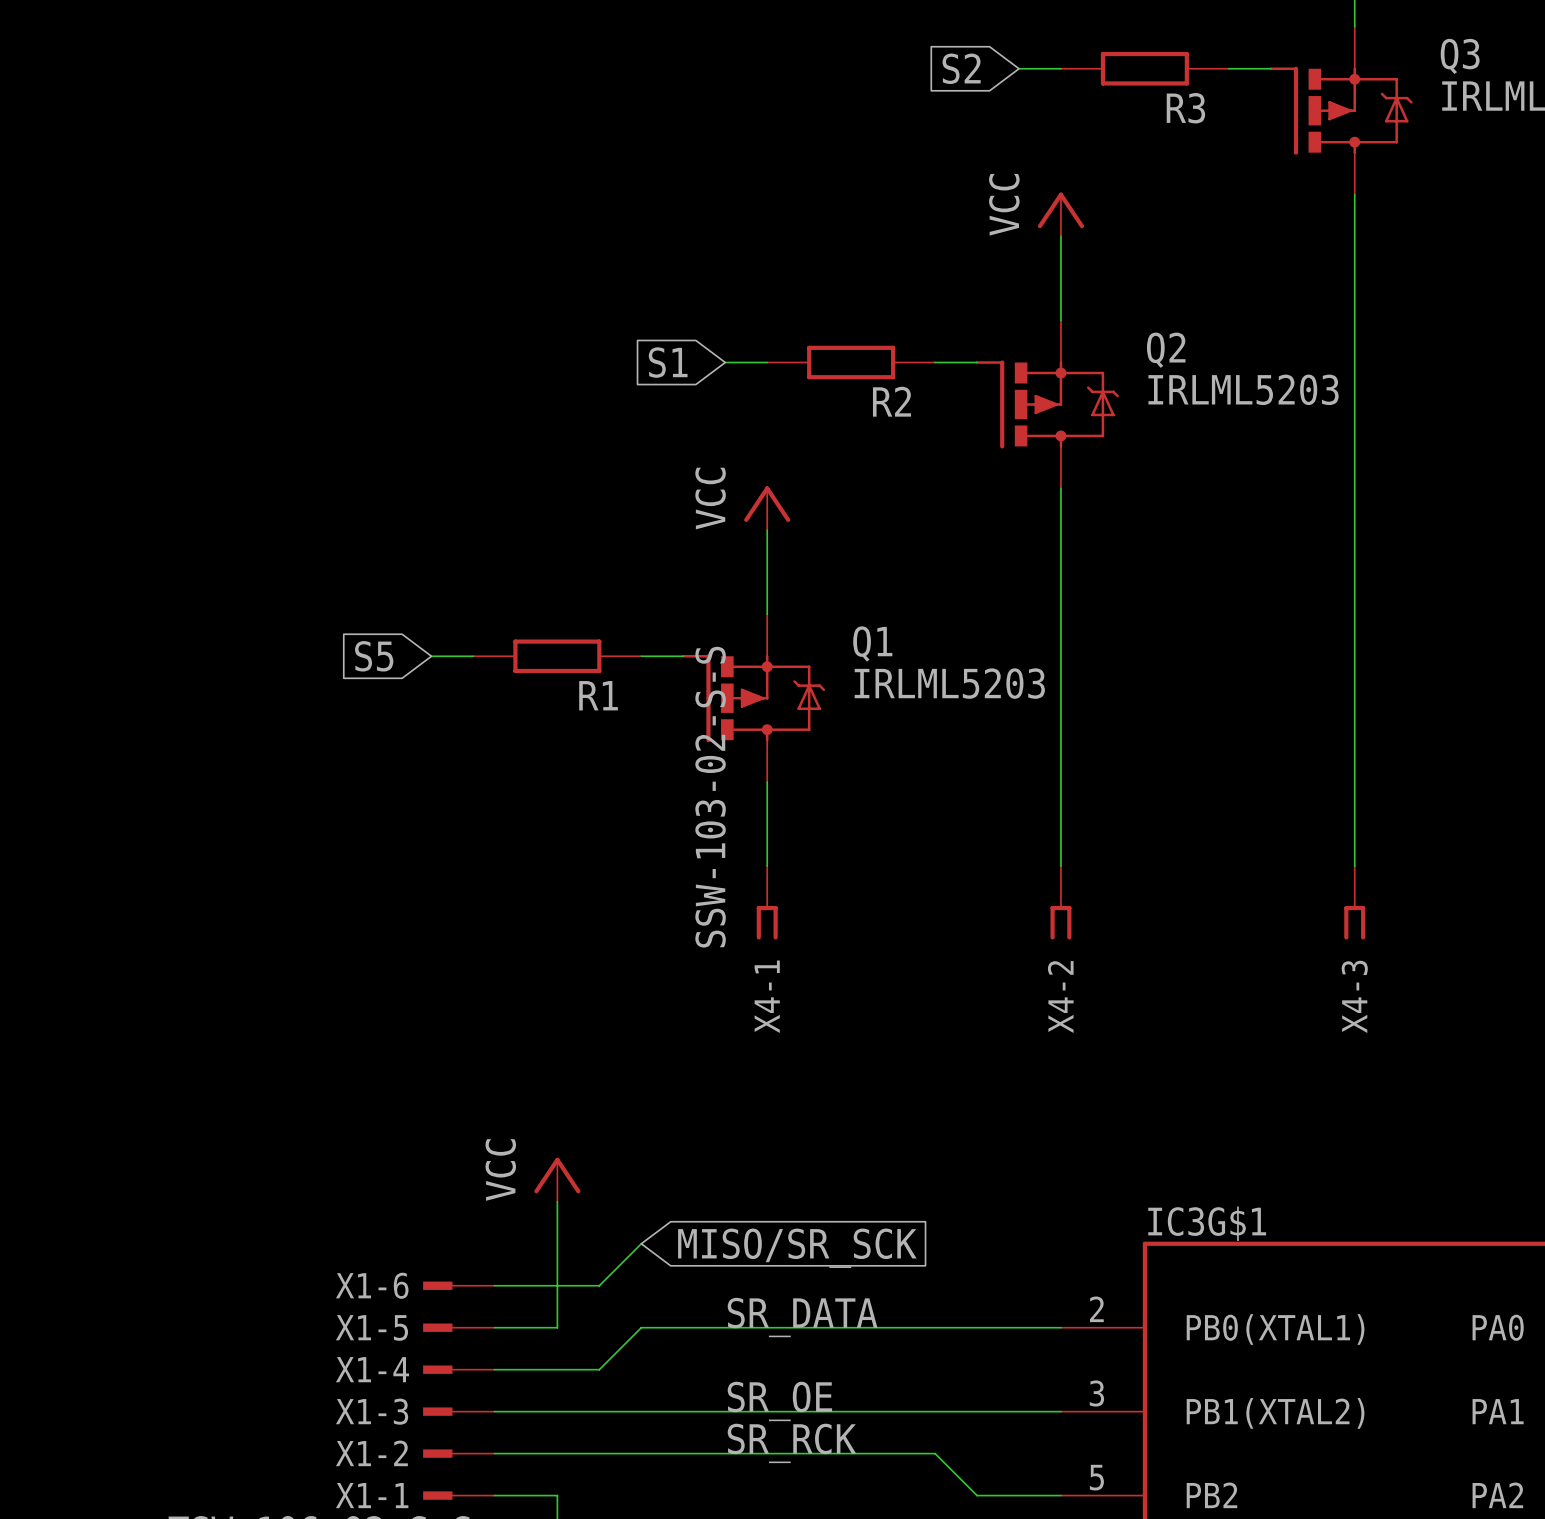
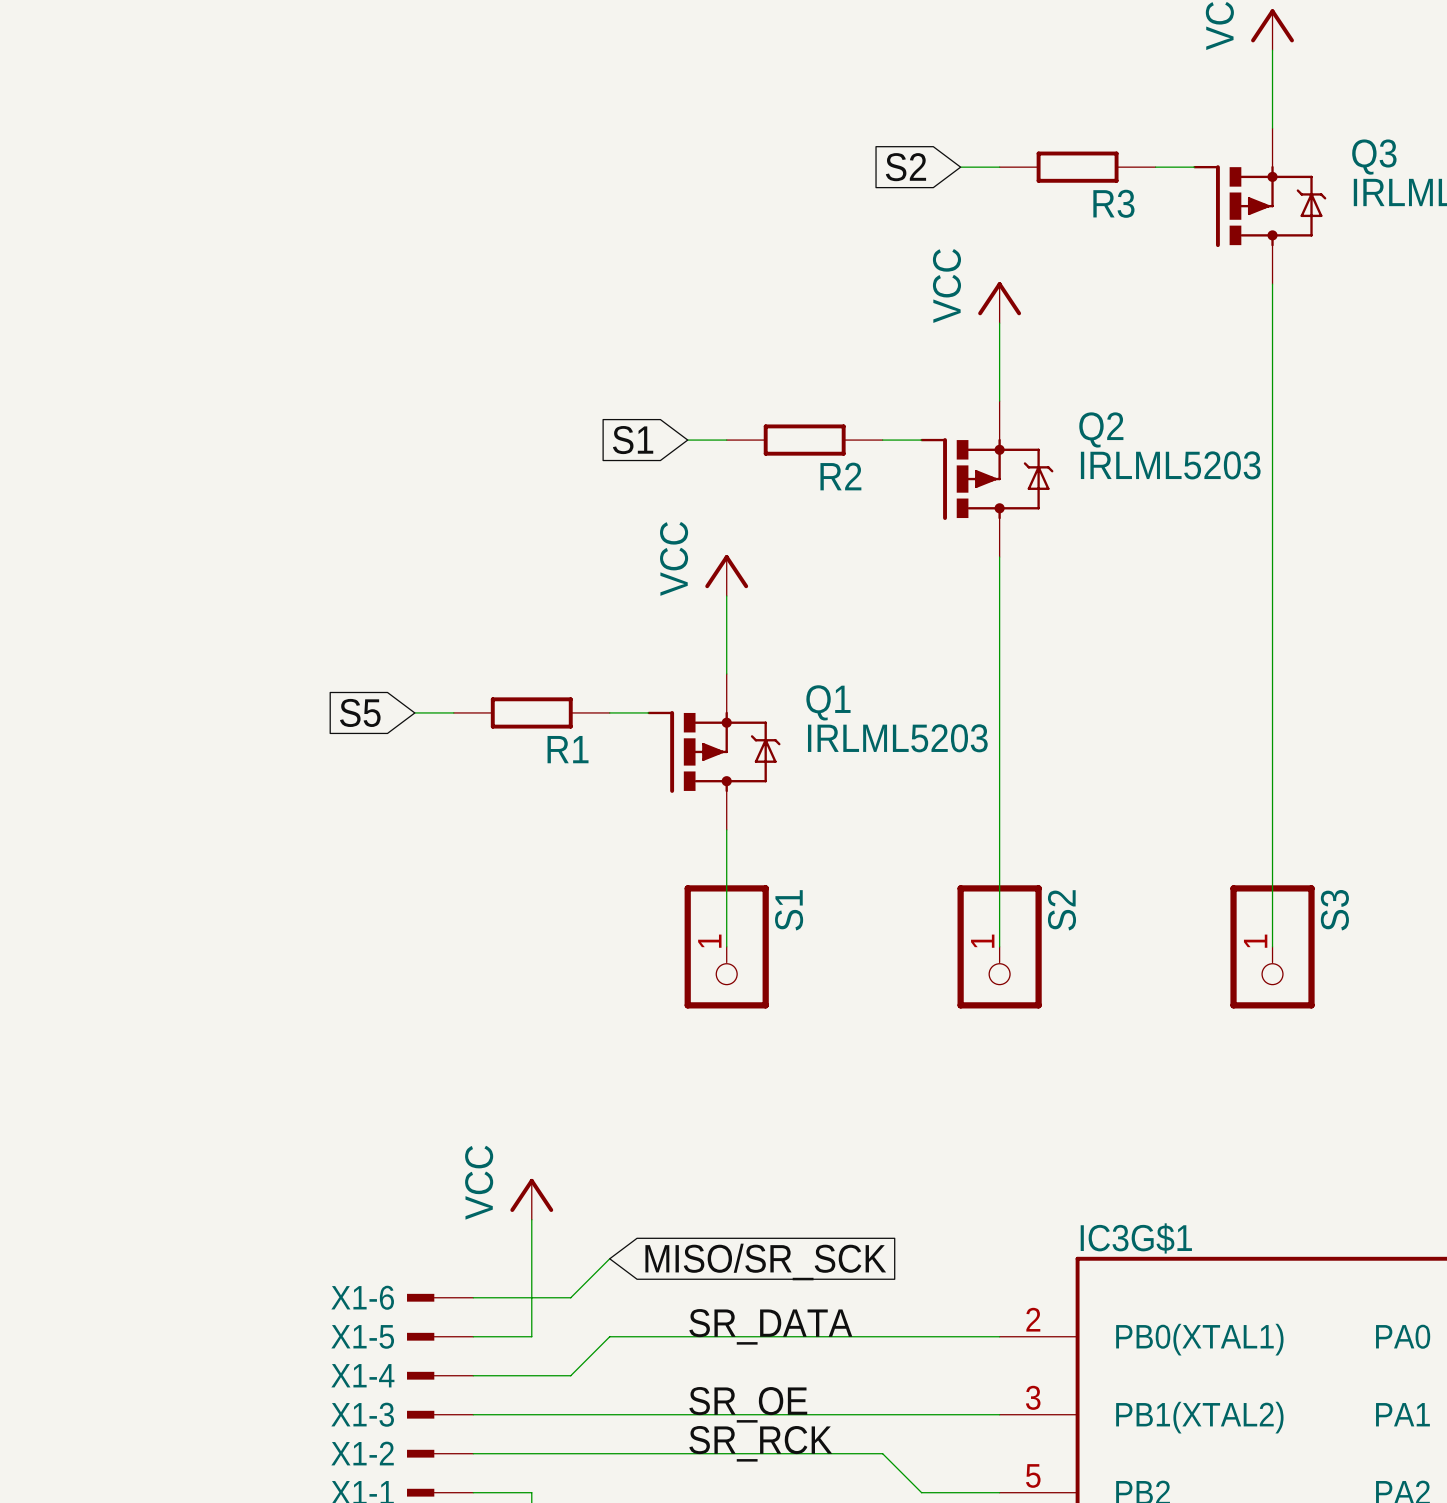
X4-1: SSW-103-02-S-S (767, 902) -> none
X4-2: (1060, 902) -> none
X4-3: (1354, 902) -> none
S1: none -> (726, 946)
S2: none -> (999, 946)
S3: none -> (1272, 946)

